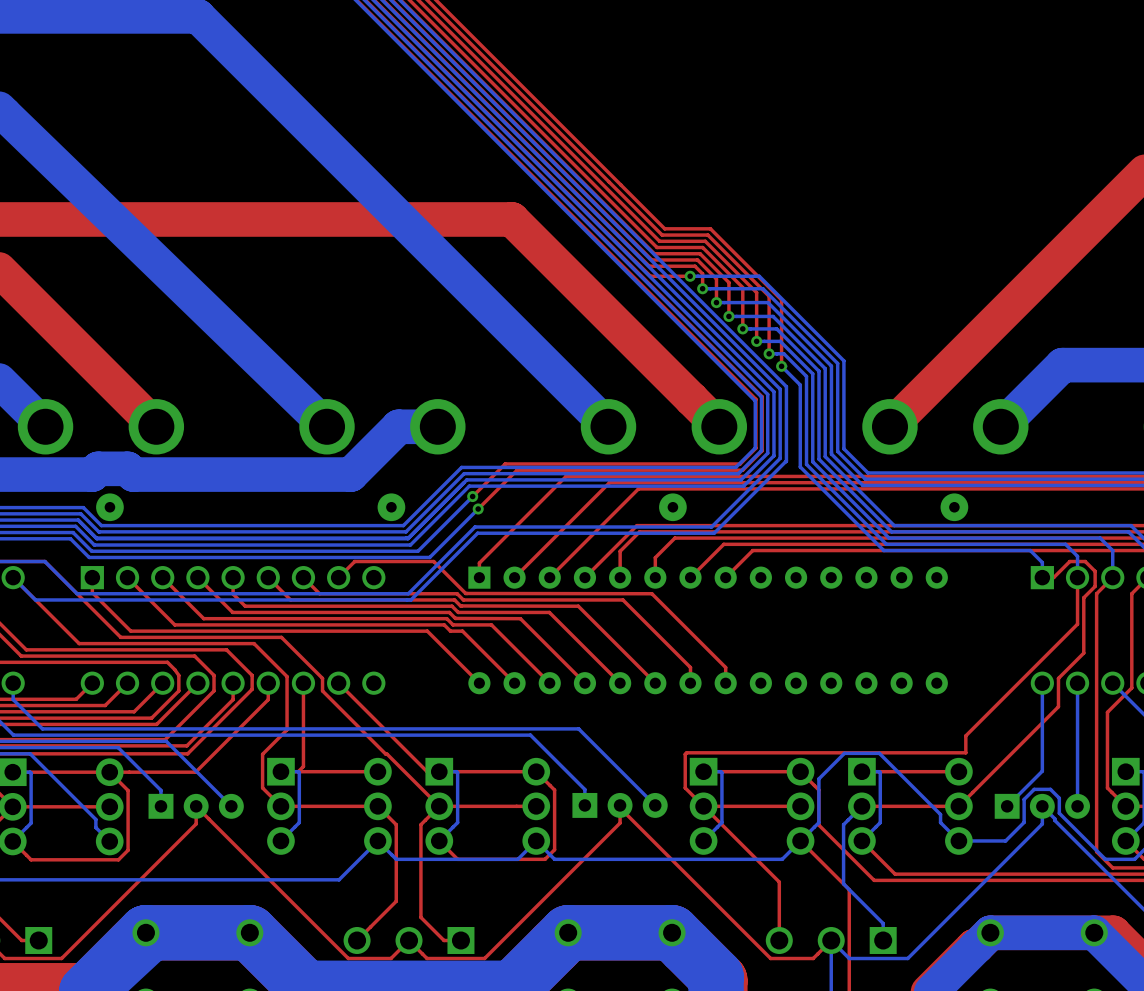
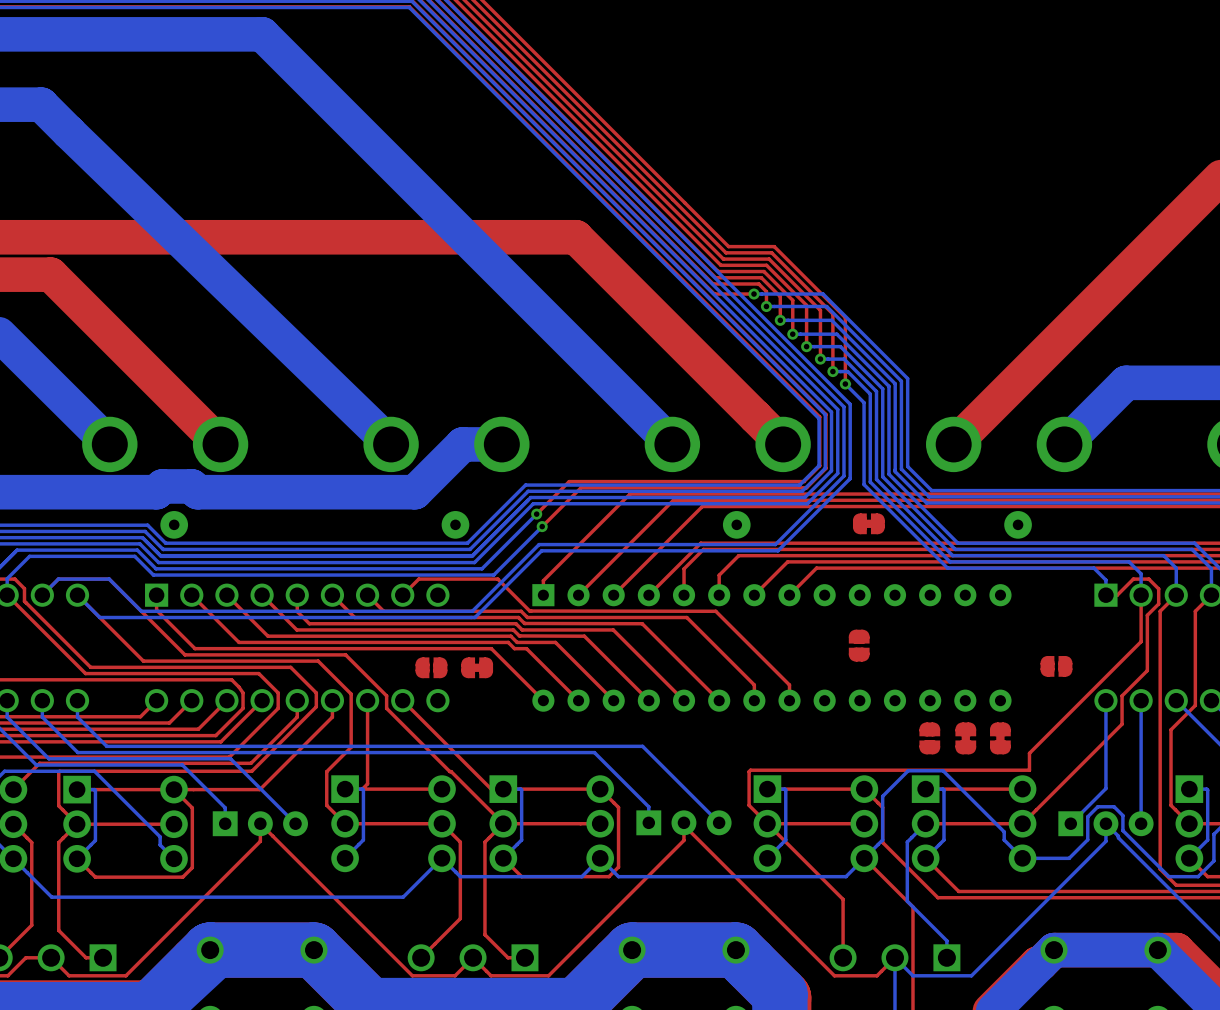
part: none -> (868, 523)
part: none -> (859, 645)
part: none -> (1056, 666)
part: none -> (431, 667)
part: none -> (477, 667)
part: none -> (929, 738)
part: none -> (965, 738)
part: none -> (1000, 738)

